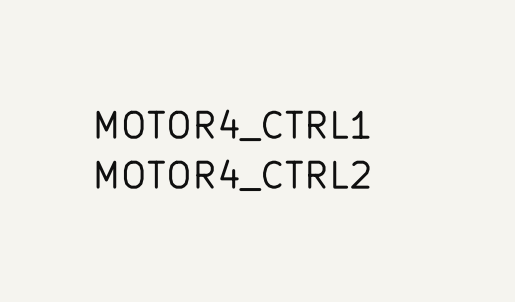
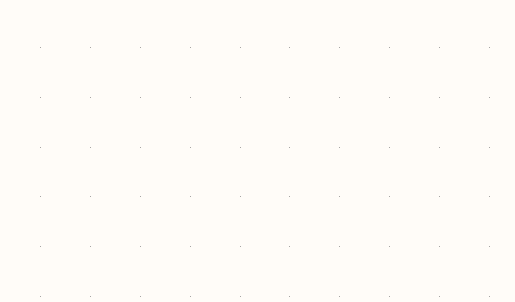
label: MOTOR4_CTRL1 (233, 125) -> none
label: MOTOR4_CTRL2 (233, 175) -> none

